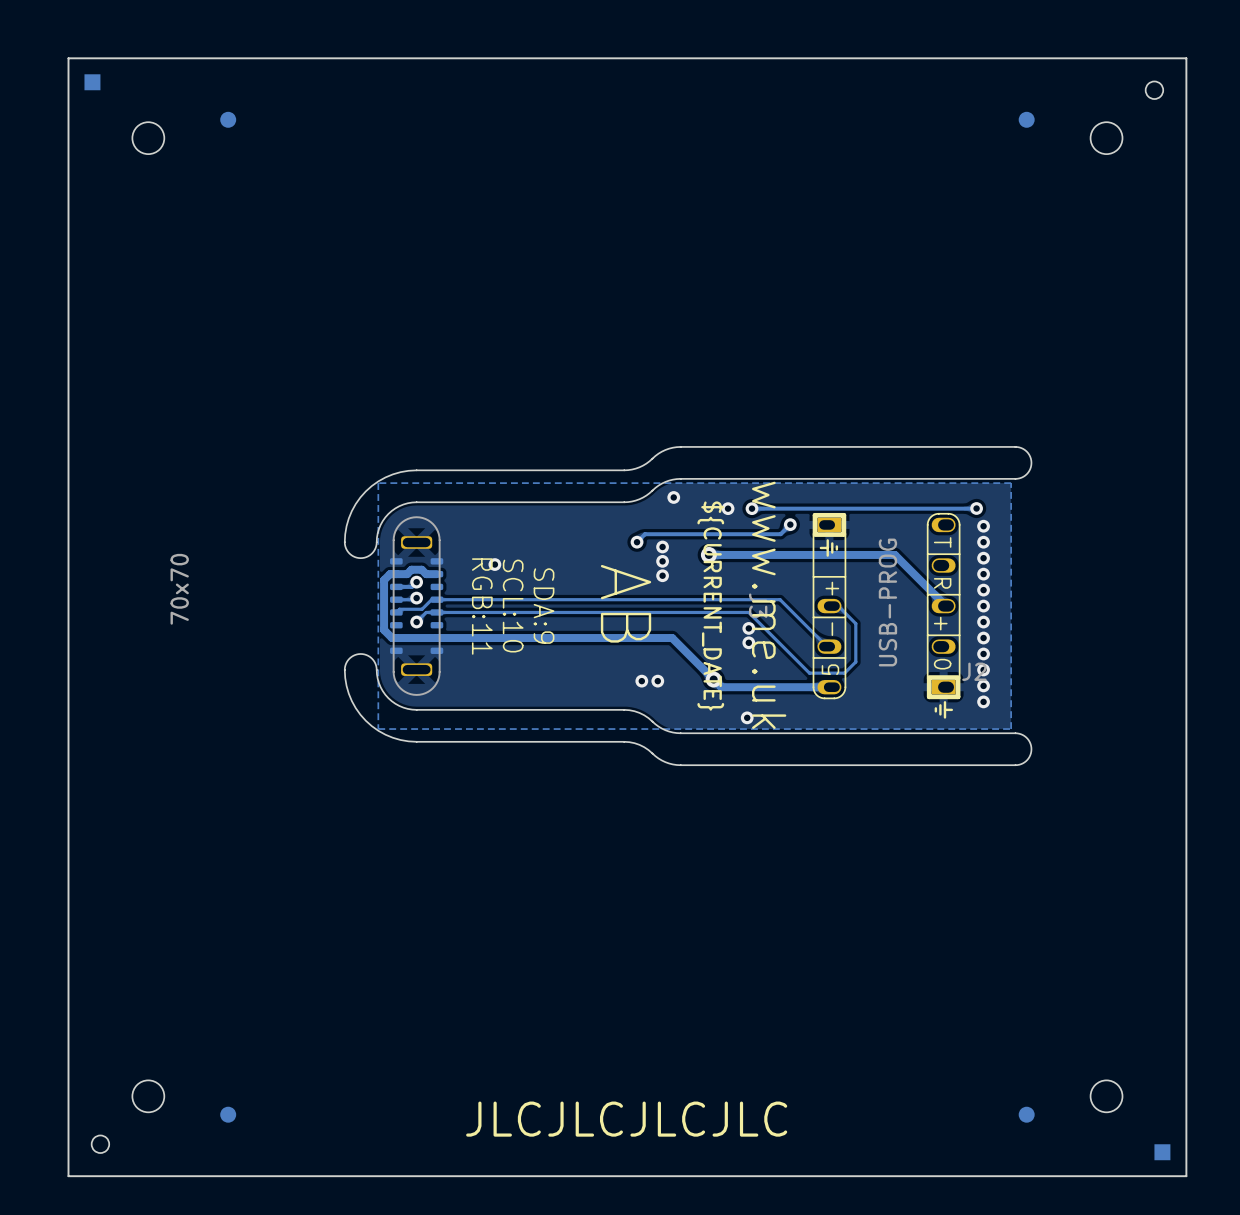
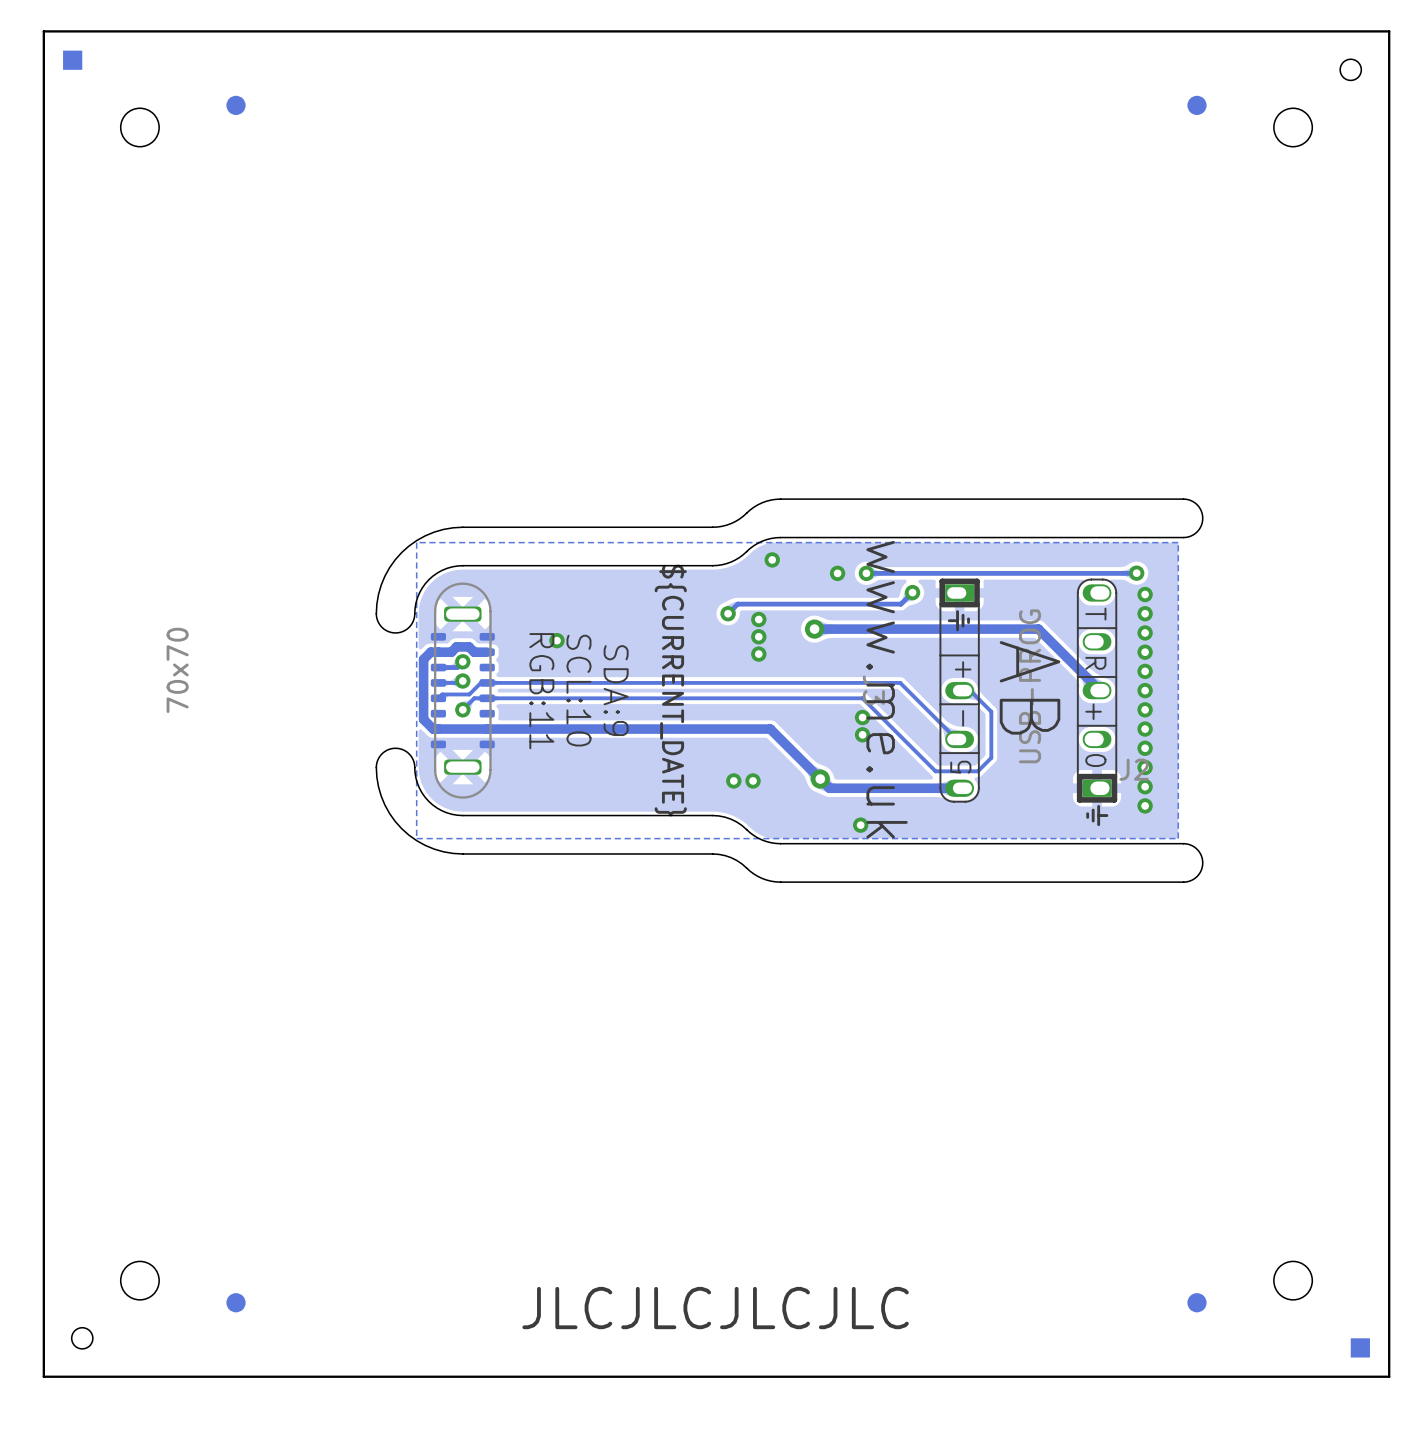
text position: AB (626, 603) -> AB (1030, 687)
text position: ${CURRENT_DATE} (710, 606) -> ${CURRENT_DATE} (670, 690)

